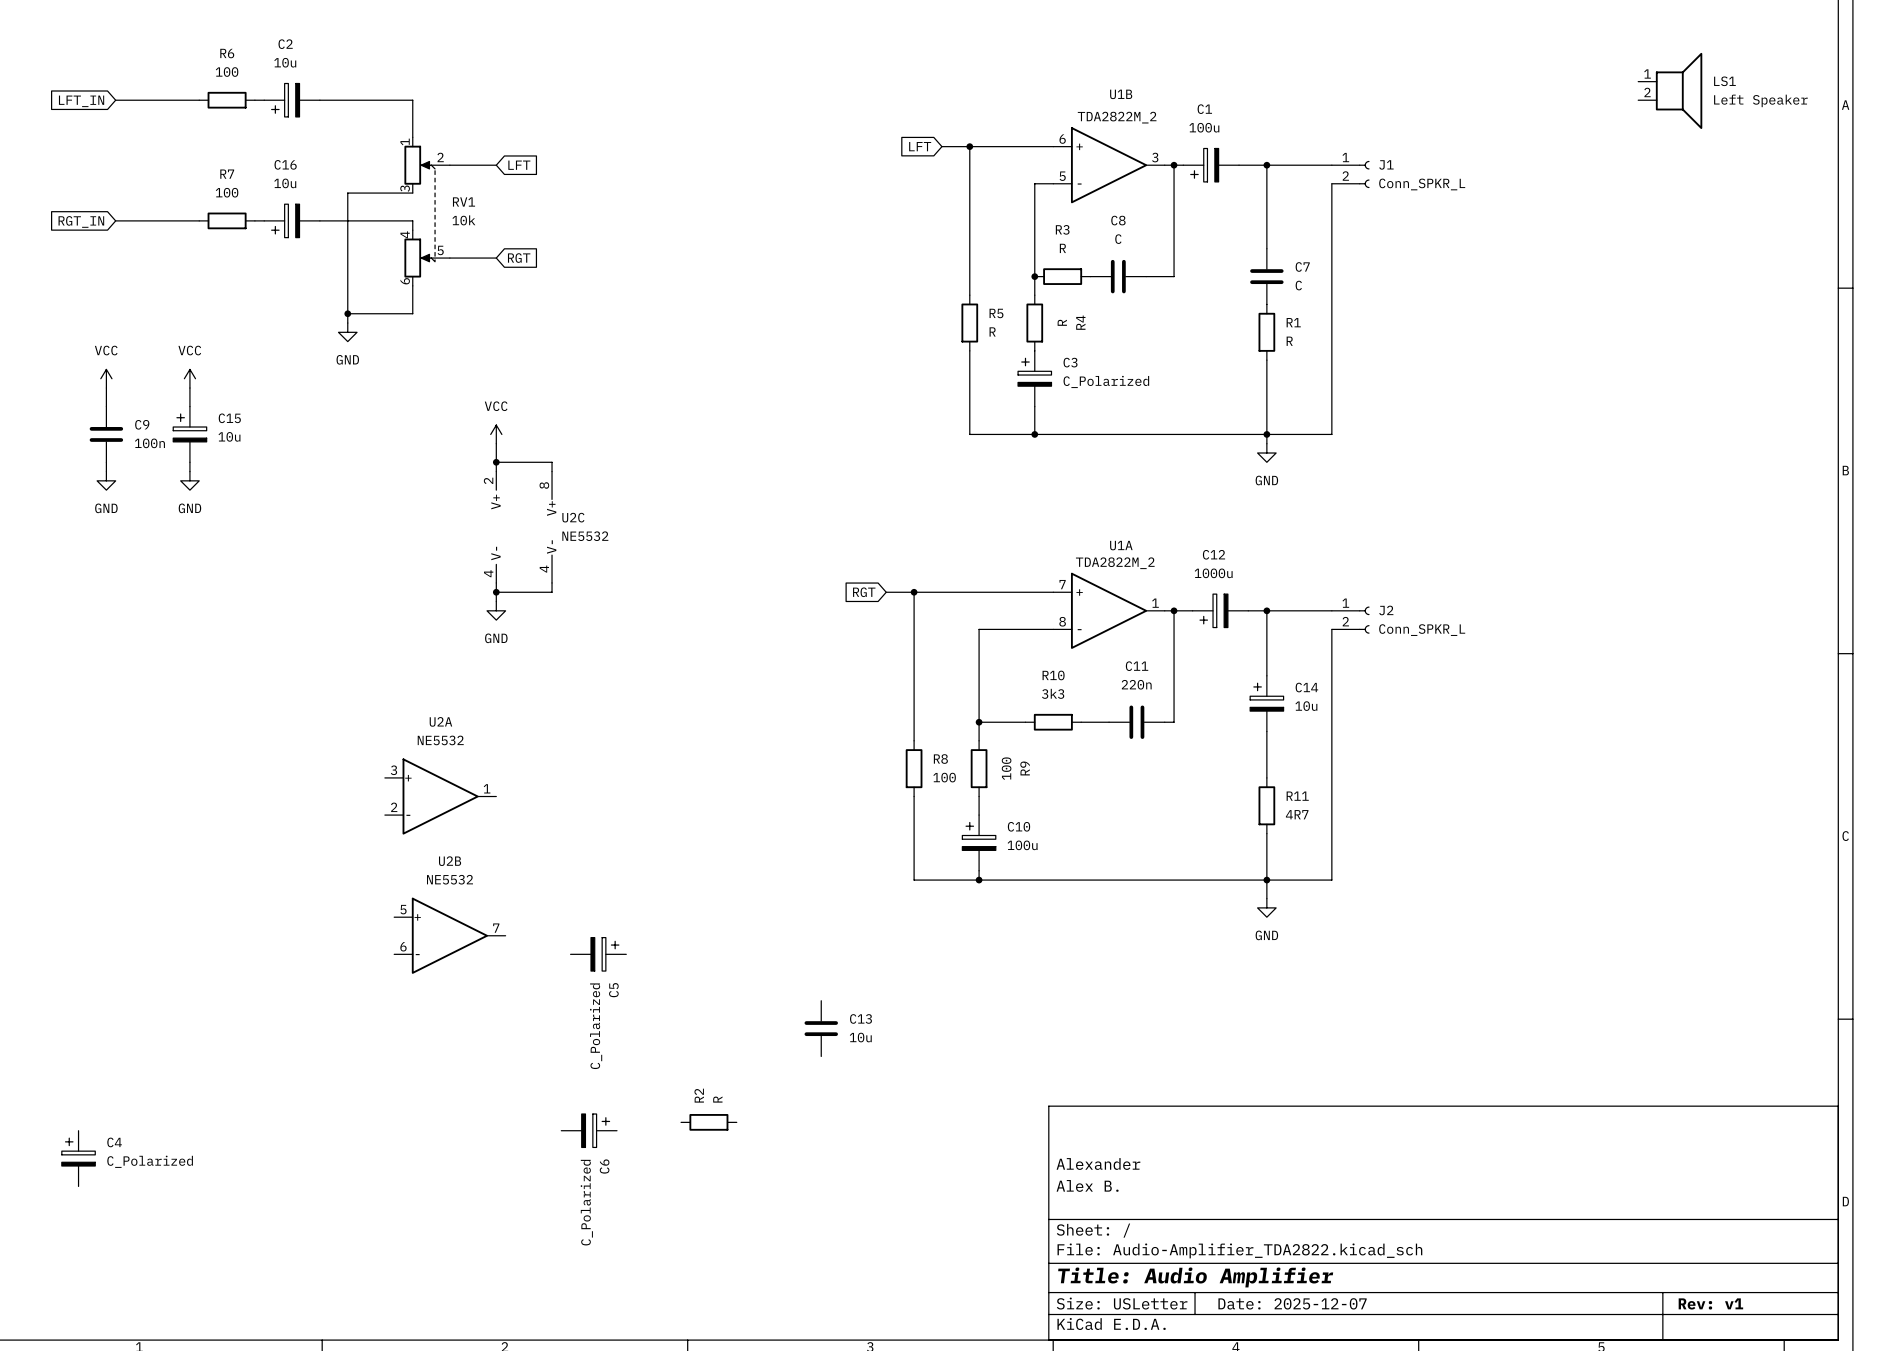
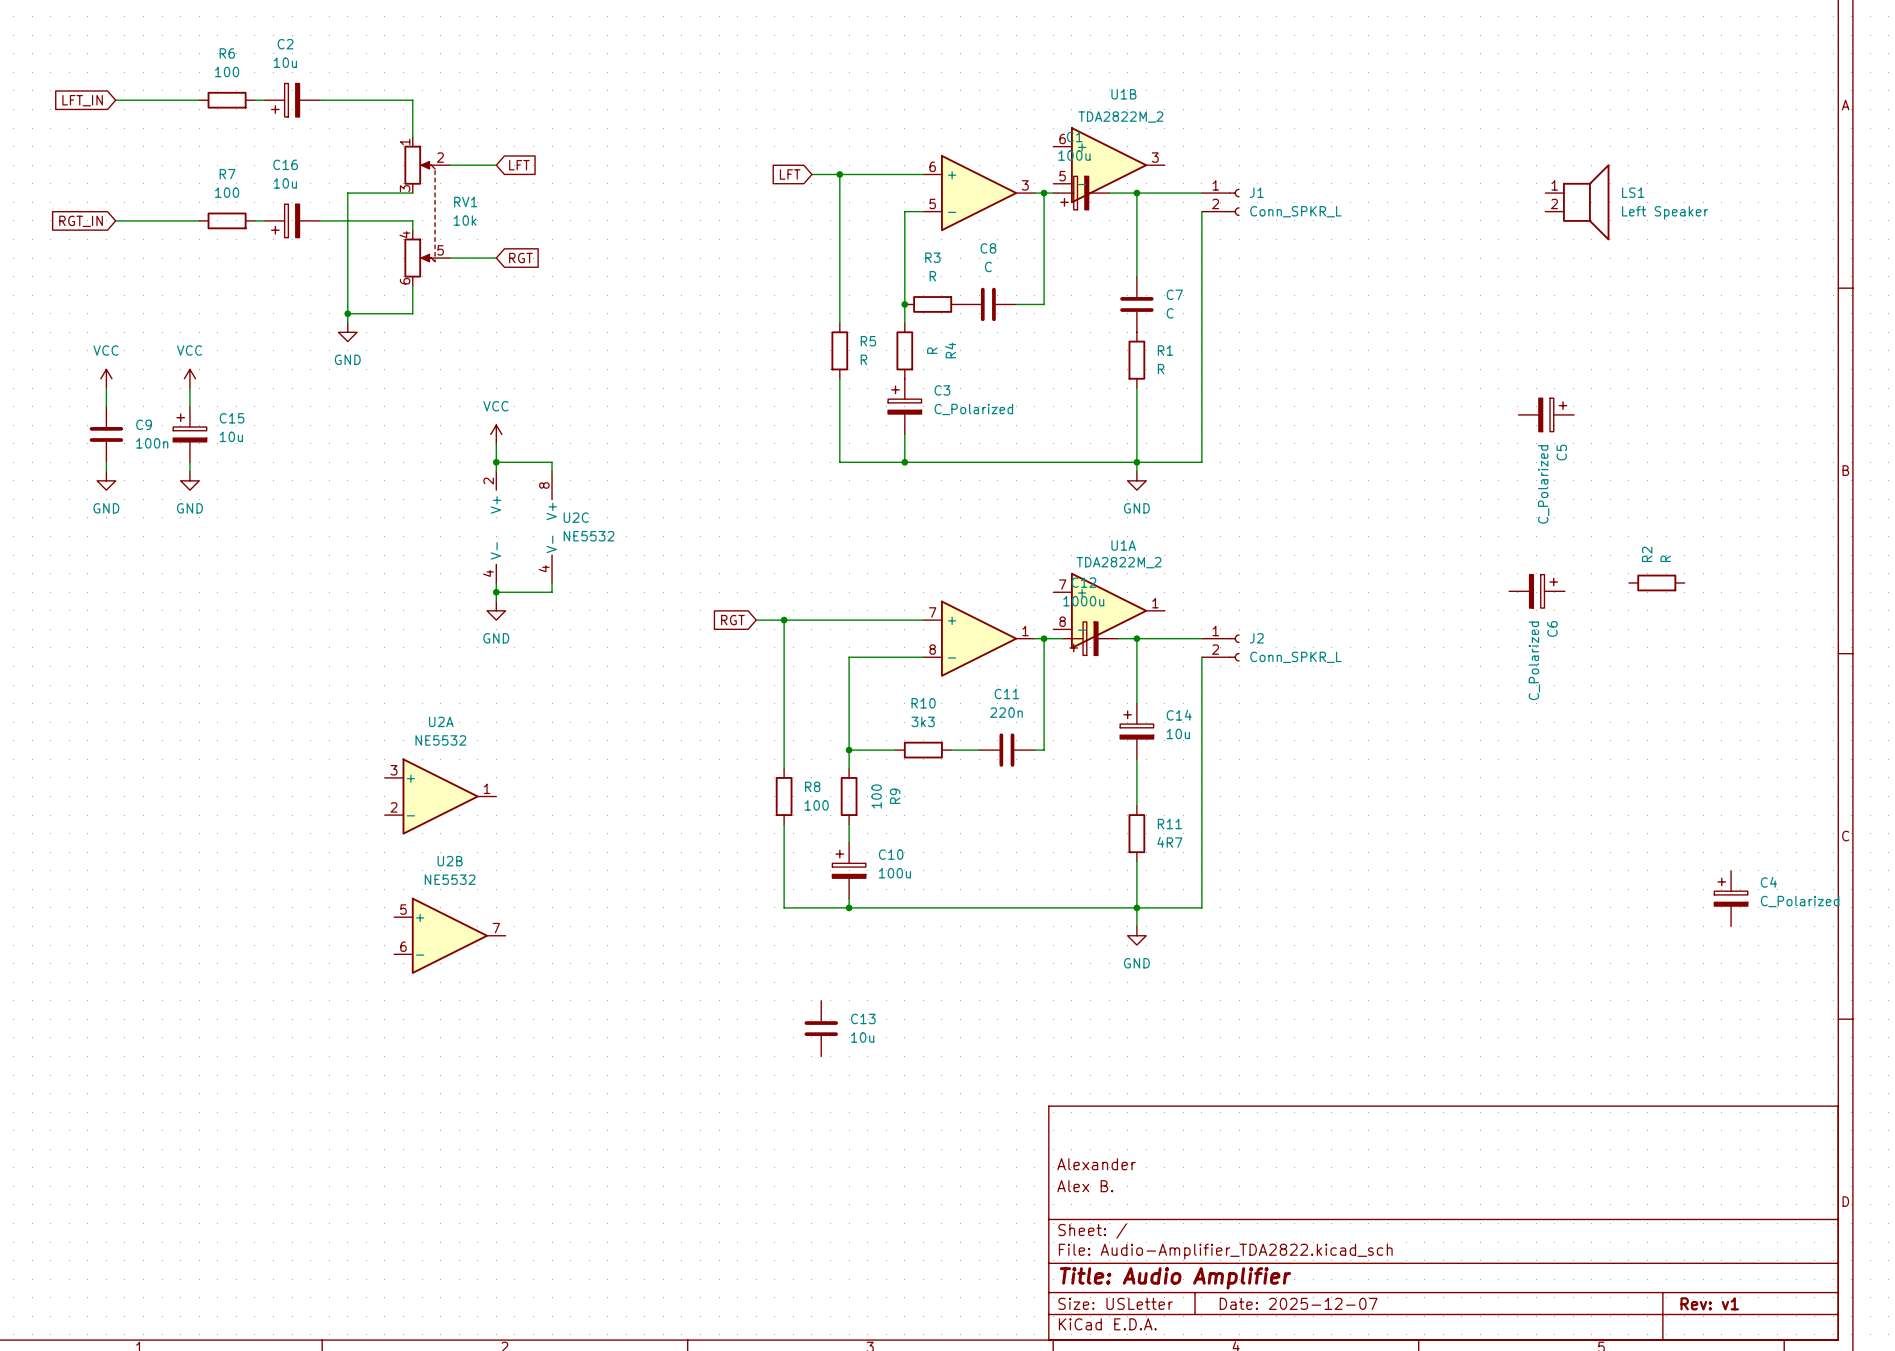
LS1 position: (1670, 90) -> (1577, 202)
global label position: LFT (920, 146) -> LFT (790, 174)
wire: (941, 146) (1053, 146) -> (811, 174) (923, 174)
wire: (969, 146) (969, 295) -> (839, 174) (839, 323)
junction: (969, 146) -> none
wire: (1164, 165) (1183, 165) -> (1034, 193) (1053, 193)
wire: (1174, 165) (1174, 276) (1146, 276) -> (1044, 193) (1044, 304) (1016, 304)
junction: (1174, 165) -> none
C1 position: (1211, 165) -> (1081, 193)
wire: (1239, 165) (1331, 165) -> (1109, 193) (1201, 193)
wire: (1266, 165) (1266, 248) -> (1136, 193) (1136, 276)
junction: (1266, 165) -> none
junction: none -> (839, 174)
J1 position: (1350, 174) -> (1220, 202)
wire: (1053, 183) (1034, 183) (1034, 295) -> (923, 211) (904, 211) (904, 323)
wire: (1331, 183) (1331, 434) (969, 434) (969, 350) -> (1201, 211) (1201, 462) (839, 462) (839, 378)
part: none -> (979, 193)
junction: none -> (1044, 193)
junction: none -> (1136, 193)
junction: (1034, 276) -> none
R3 position: (1062, 276) -> (932, 304)
C8 position: (1118, 276) -> (988, 304)
C7 position: (1266, 276) -> (1136, 304)
junction: none -> (904, 304)
R5 position: (969, 323) -> (839, 350)
R4 position: (1034, 323) -> (904, 350)
R1 position: (1266, 332) -> (1136, 360)
wire: (1266, 360) (1266, 443) -> (1136, 388) (1136, 471)
C3 position: (1034, 378) -> (904, 406)
wire: (1034, 406) (1034, 434) -> (904, 434) (904, 462)
junction: (1034, 434) -> none
junction: (1266, 434) -> none
power symbol position: GND (1266, 453) -> GND (1136, 480)
junction: none -> (904, 462)
junction: none -> (1136, 462)
global label position: RGT (864, 592) -> RGT (732, 620)
wire: (886, 592) (1053, 592) -> (756, 620) (923, 620)
wire: (914, 592) (914, 740) -> (784, 620) (784, 768)
junction: (914, 592) -> none
wire: (1164, 610) (1192, 610) -> (1034, 638) (1062, 638)
wire: (1174, 610) (1174, 722) (1164, 722) -> (1044, 638) (1044, 750) (1034, 750)
junction: (1174, 610) -> none
C12 position: (1220, 610) -> (1090, 638)
wire: (1248, 610) (1331, 610) -> (1118, 638) (1201, 638)
wire: (1266, 610) (1266, 675) -> (1136, 638) (1136, 703)
junction: (1266, 610) -> none
junction: none -> (784, 620)
J2 position: (1350, 620) -> (1220, 647)
wire: (1053, 629) (979, 629) (979, 740) -> (923, 657) (849, 657) (849, 768)
wire: (1331, 629) (1331, 880) (914, 880) (914, 796) -> (1201, 657) (1201, 907) (784, 907) (784, 824)
part: none -> (979, 638)
junction: none -> (1044, 638)
junction: none -> (1136, 638)
C14 position: (1266, 703) -> (1136, 731)
wire: (979, 722) (1025, 722) -> (849, 750) (895, 750)
junction: (979, 722) -> none
R10 position: (1053, 722) -> (923, 750)
wire: (1081, 722) (1109, 722) -> (951, 750) (979, 750)
C11 position: (1136, 722) -> (1006, 750)
wire: (1266, 731) (1266, 777) -> (1136, 759) (1136, 805)
junction: none -> (849, 750)
R8 position: (914, 768) -> (784, 796)
R9 position: (979, 768) -> (849, 796)
wire: (979, 796) (979, 815) -> (849, 824) (849, 842)
R11 position: (1266, 805) -> (1136, 833)
wire: (1266, 833) (1266, 898) -> (1136, 861) (1136, 926)
C10 position: (979, 842) -> (849, 870)
wire: (979, 870) (979, 880) -> (849, 898) (849, 907)
junction: (979, 880) -> none
junction: (1266, 880) -> none
junction: none -> (849, 907)
junction: none -> (1136, 907)
power symbol position: GND (1266, 907) -> GND (1136, 935)
C5 position: (598, 954) -> (1546, 414)
R2 position: (708, 1122) -> (1656, 582)
C6 position: (589, 1130) -> (1537, 591)
C4 position: (78, 1158) -> (1731, 898)

